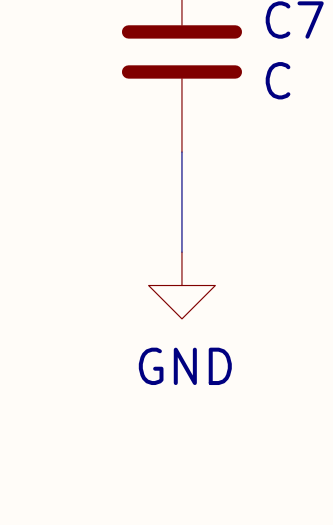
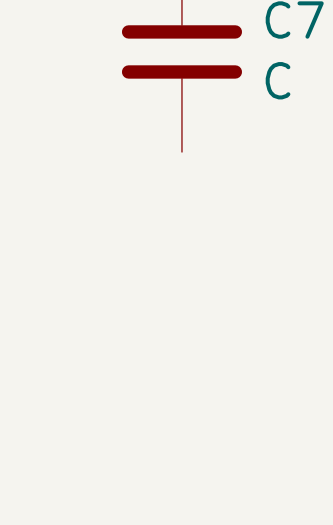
wire: (181, 152) (181, 252) -> none
power symbol: GND (181, 285) -> none

